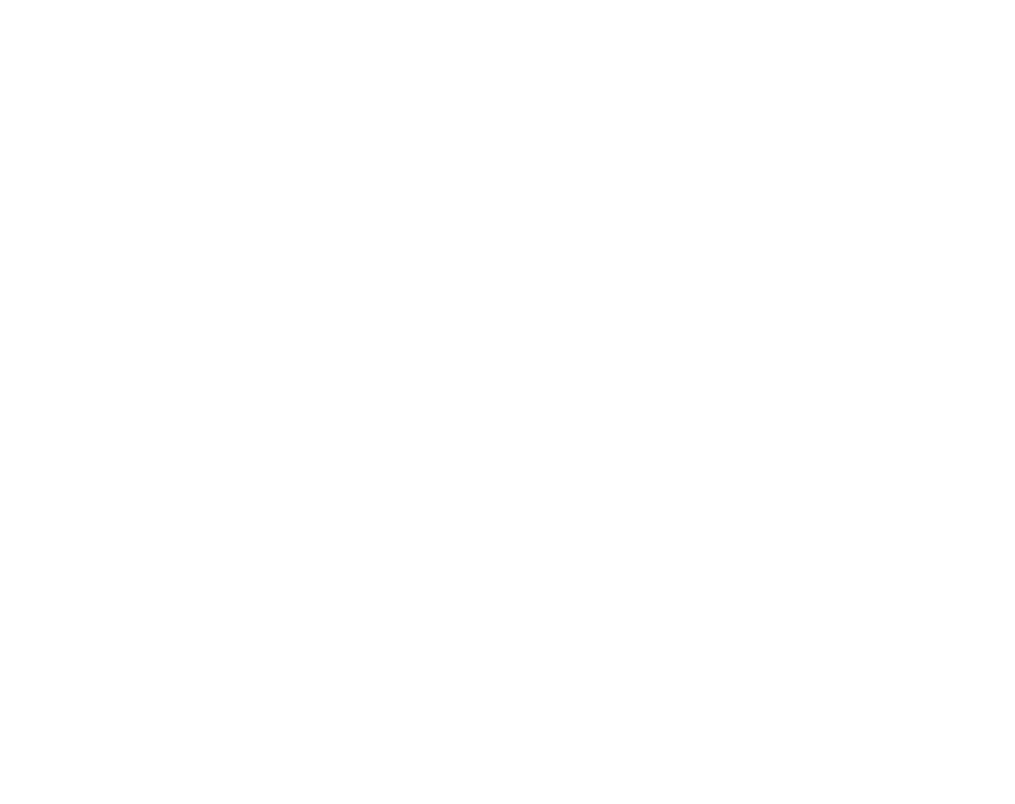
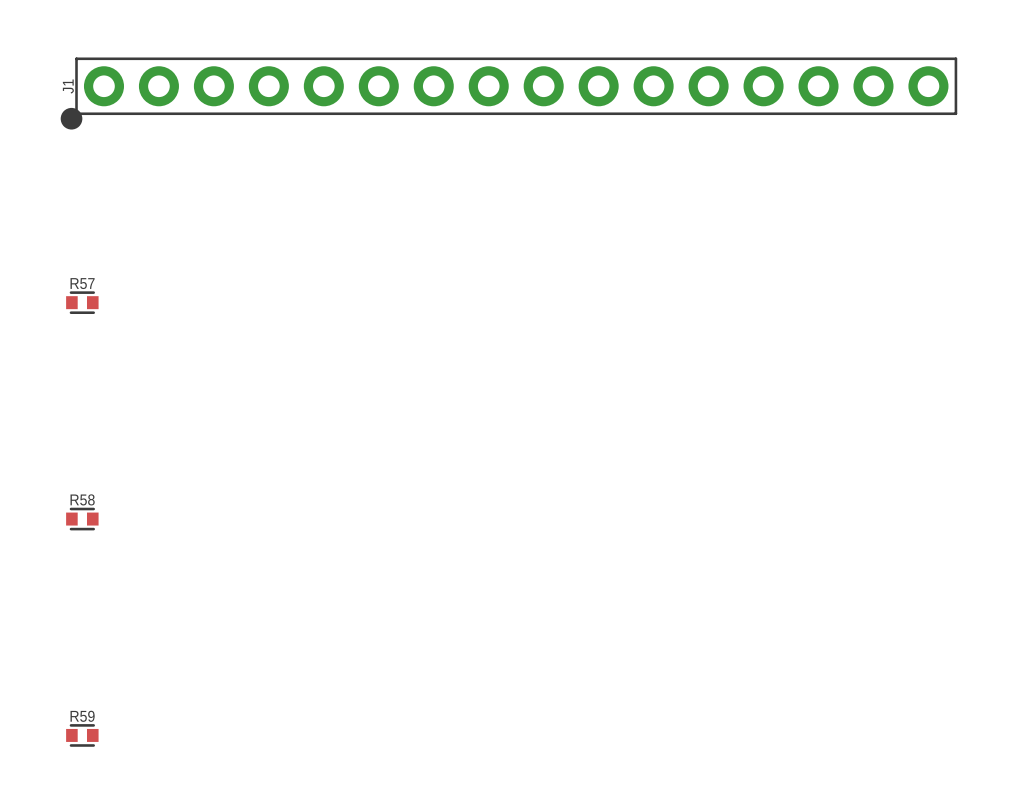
J1: none -> (508, 93)
R57: none -> (82, 302)
R58: none -> (82, 519)
R59: none -> (82, 735)

